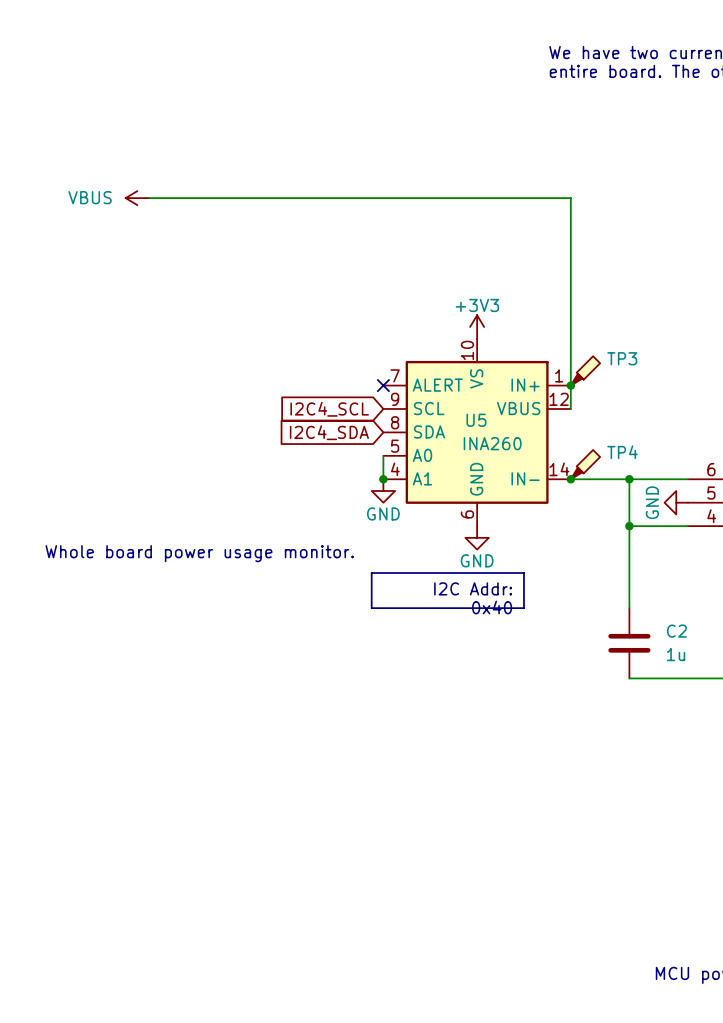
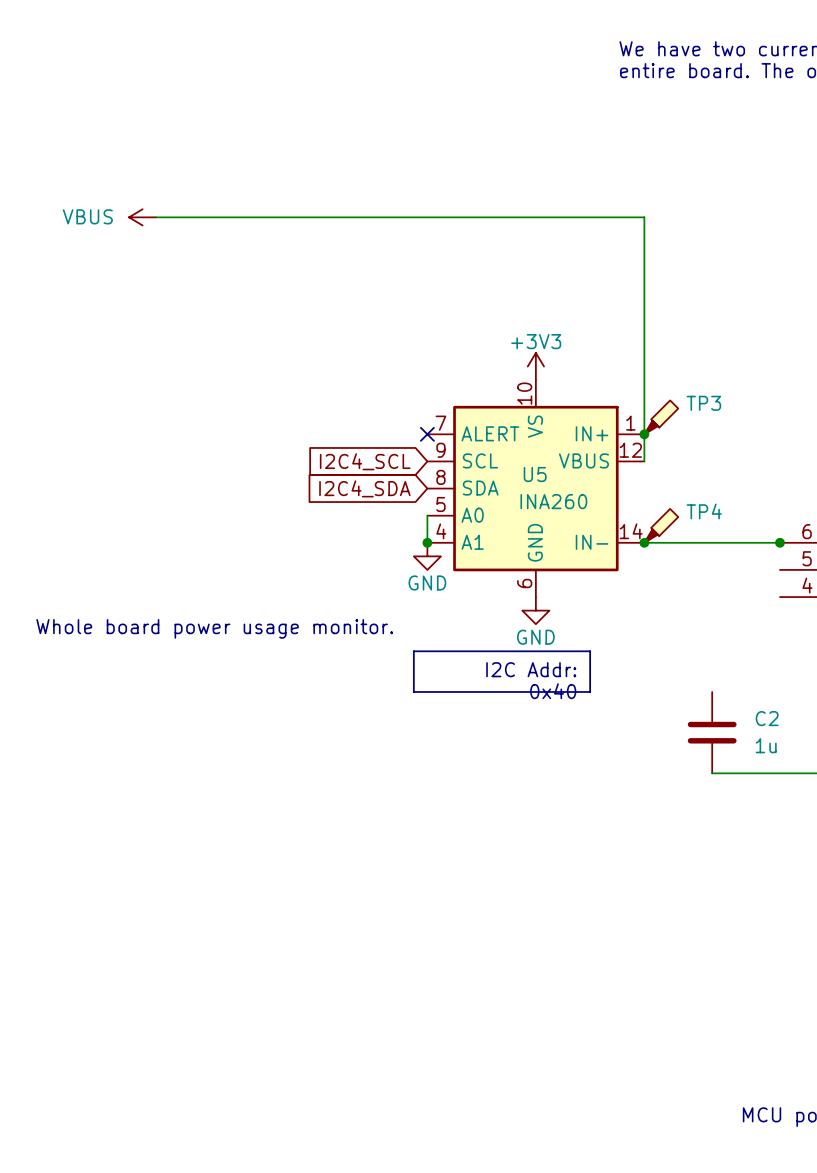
wire: (629, 479) (629, 608) -> none
junction: (629, 479) -> none
junction: none -> (779, 542)
power symbol: GND (676, 502) -> none
wire: (629, 526) (687, 526) -> none
junction: (629, 526) -> none

